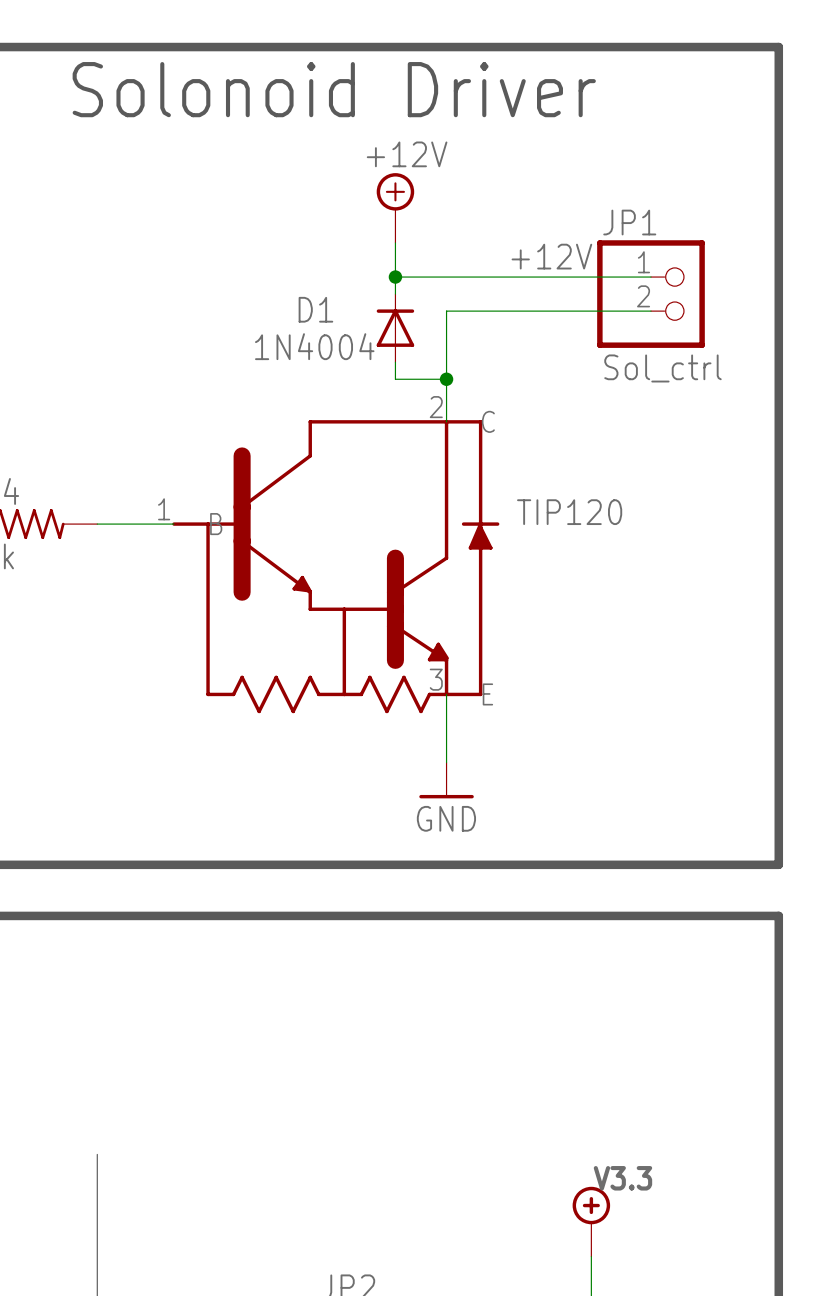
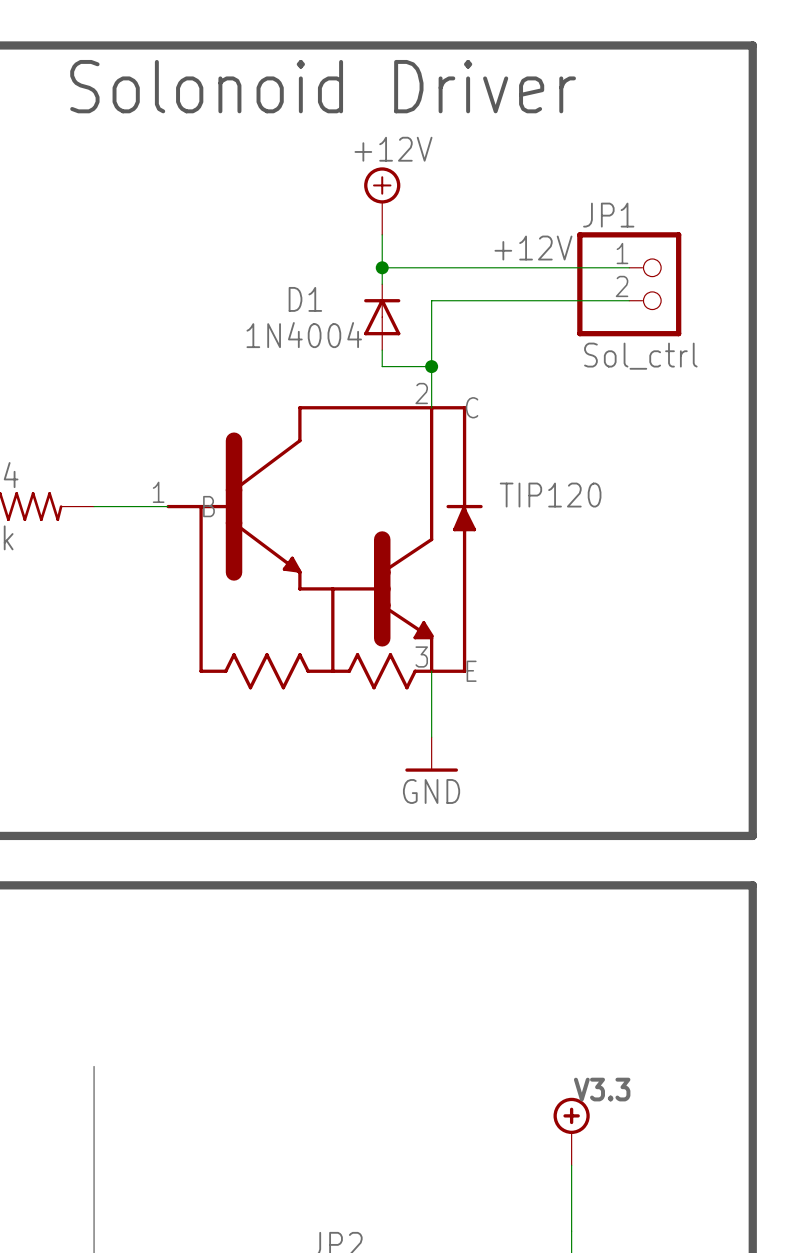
bus: none -> (94, 1066) (94, 1115)
power symbol position: V3.3 (591, 1221) -> V3.3 (571, 1131)

